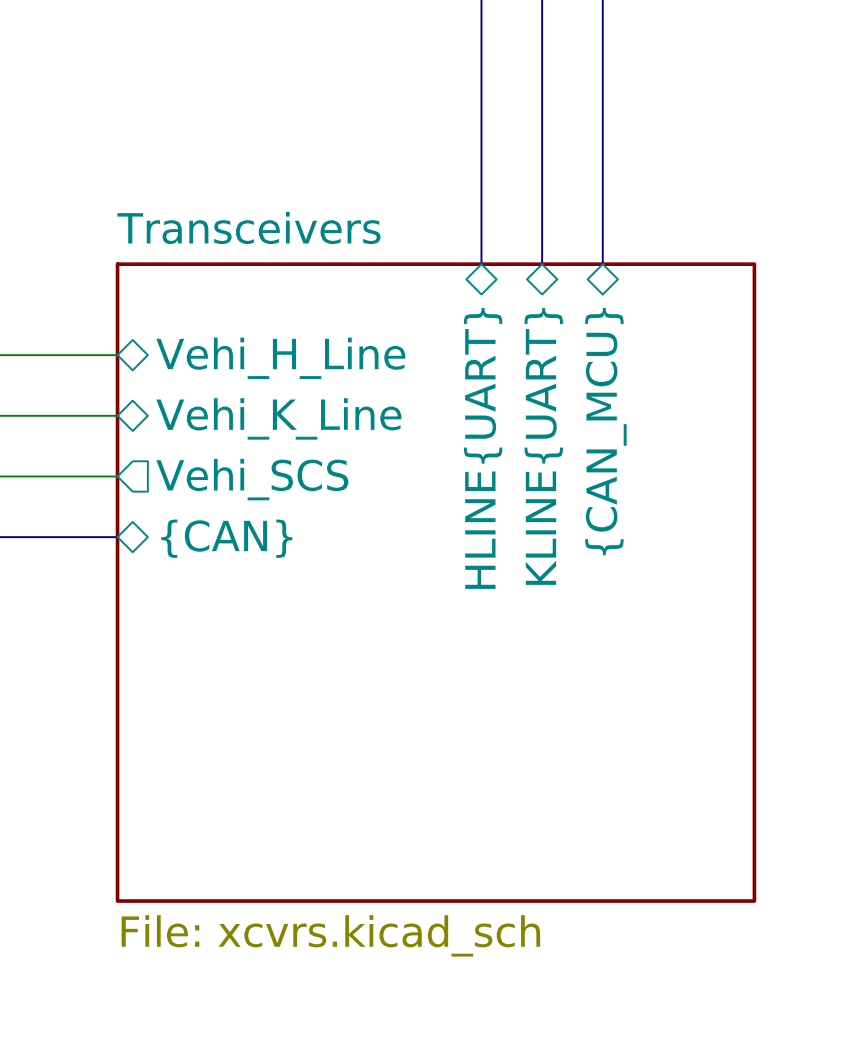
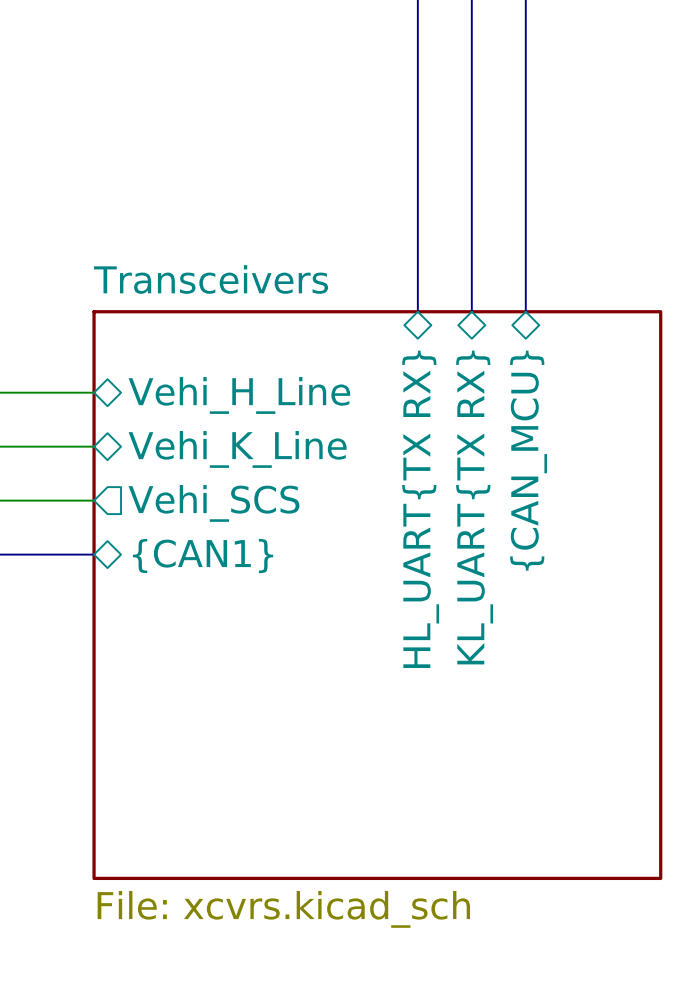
sheet pin: KLINE{UART} (543, 446) -> KL_UART{TX RX} (474, 507)
sheet pin: HLINE{UART} (483, 448) -> HL_UART{TX RX} (420, 509)
sheet pin: {CAN} (226, 538) -> {CAN1} (203, 556)

